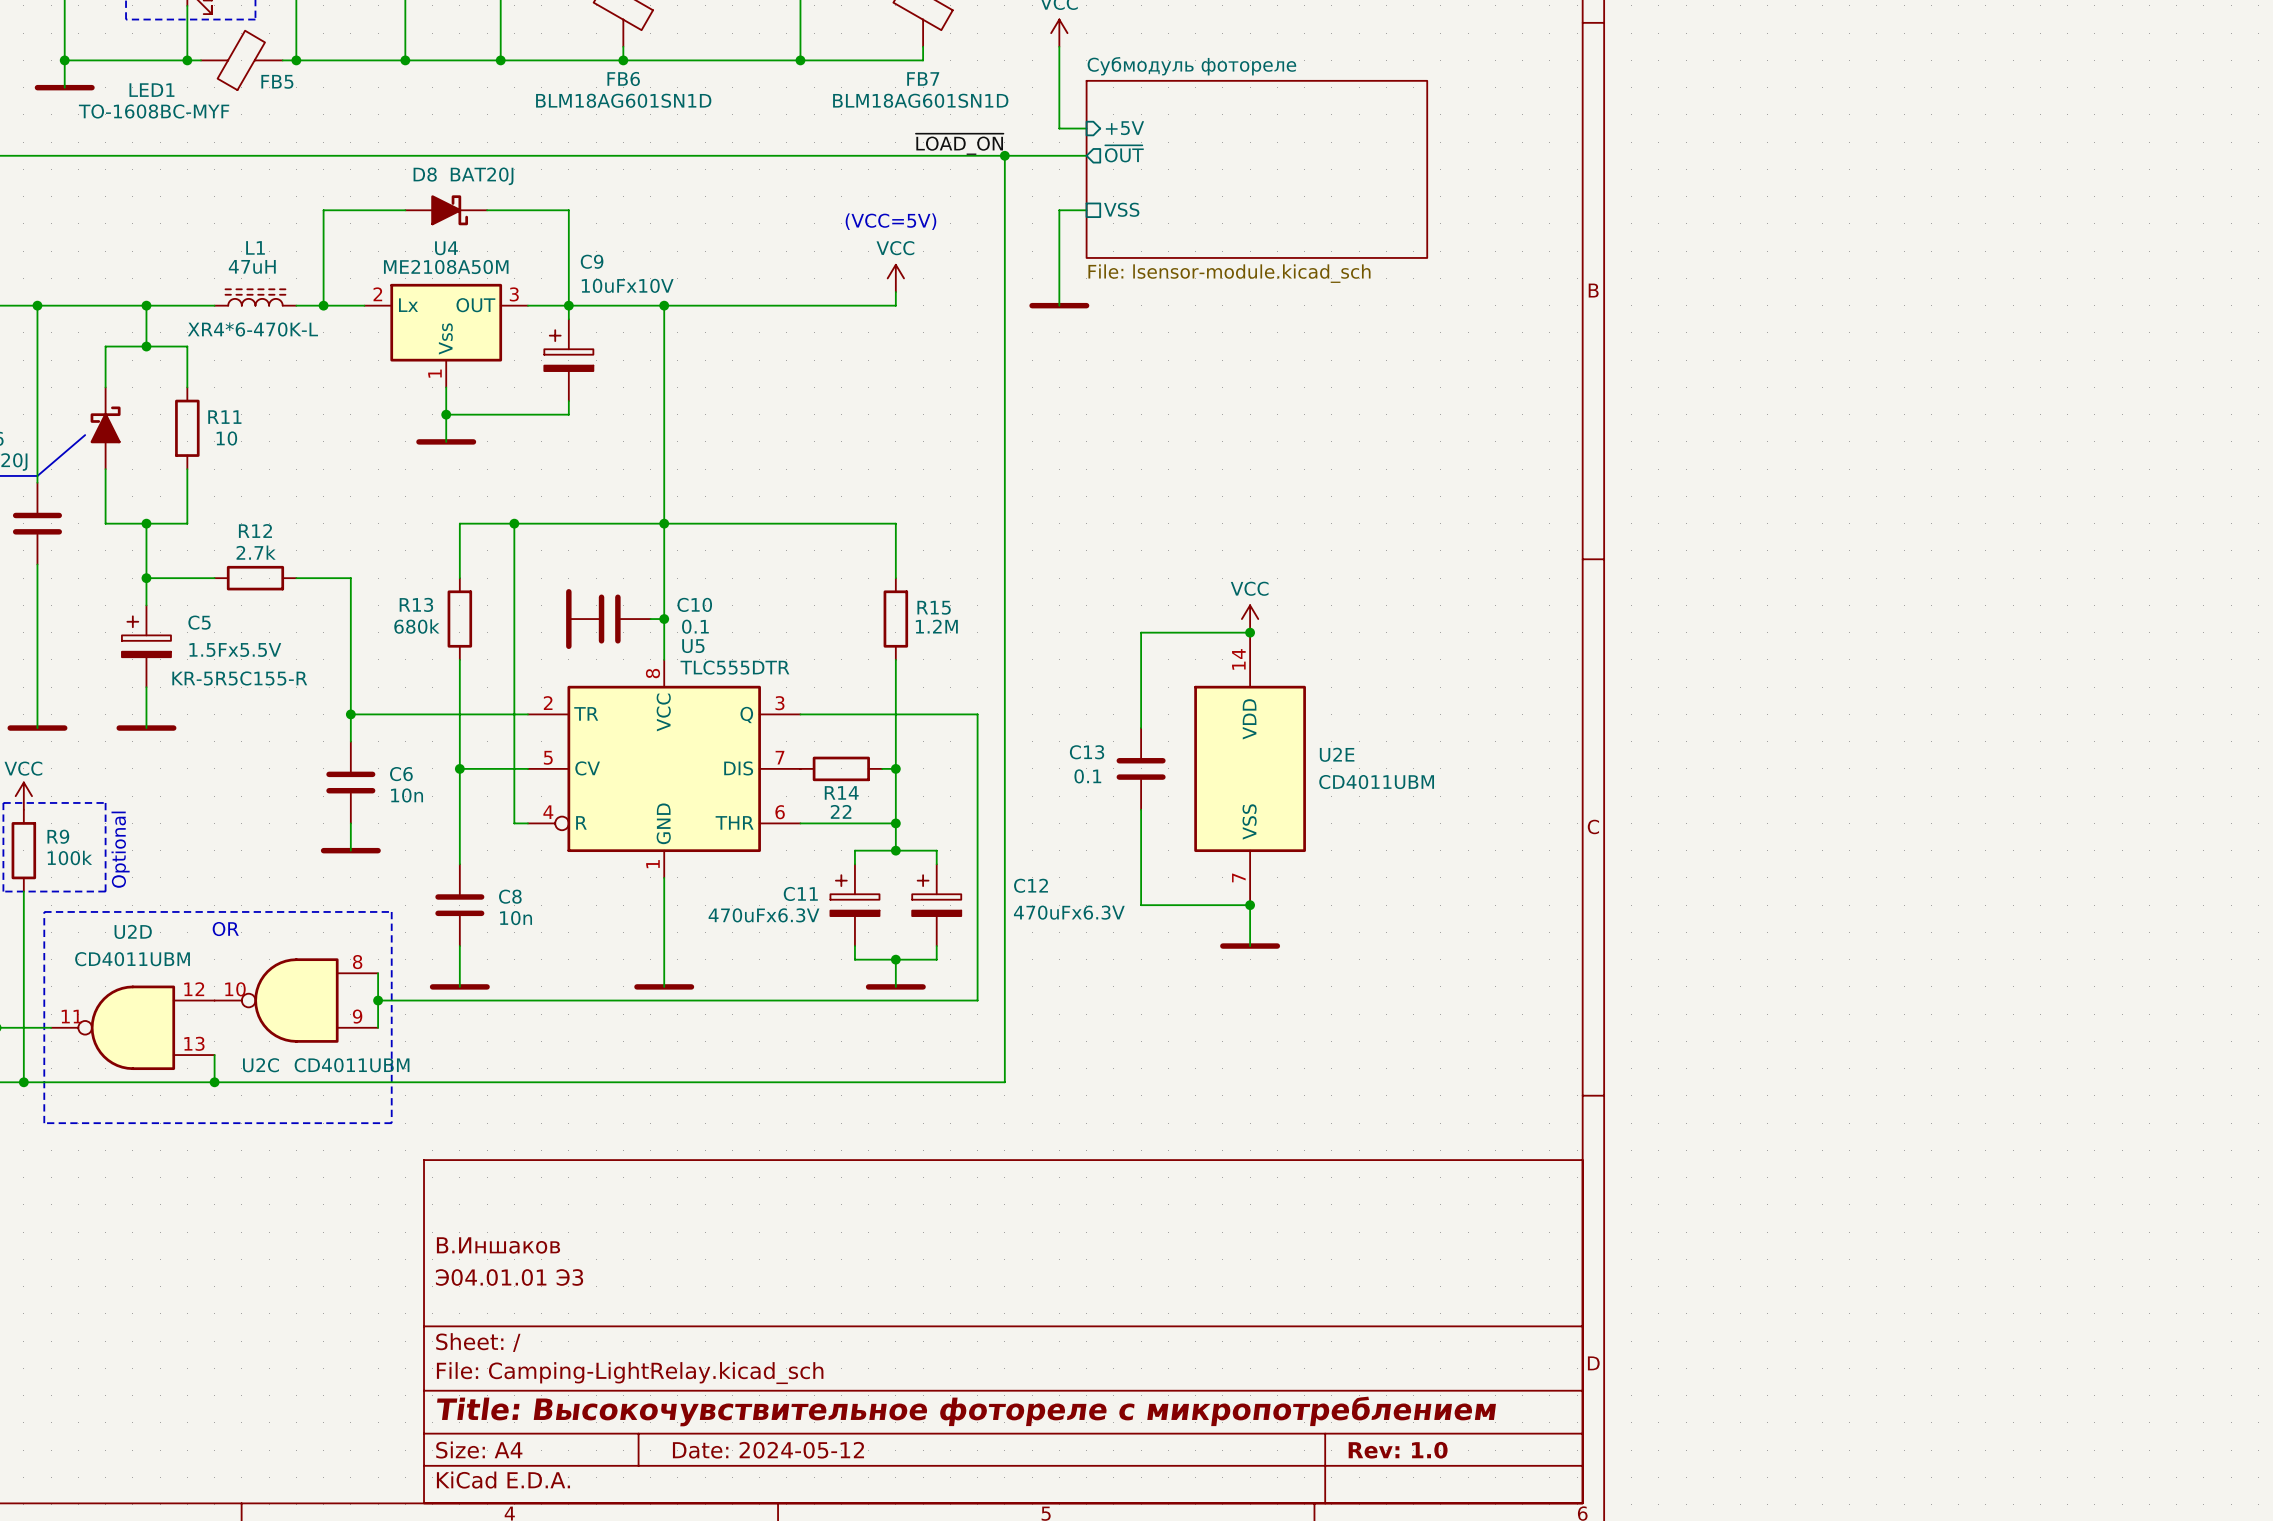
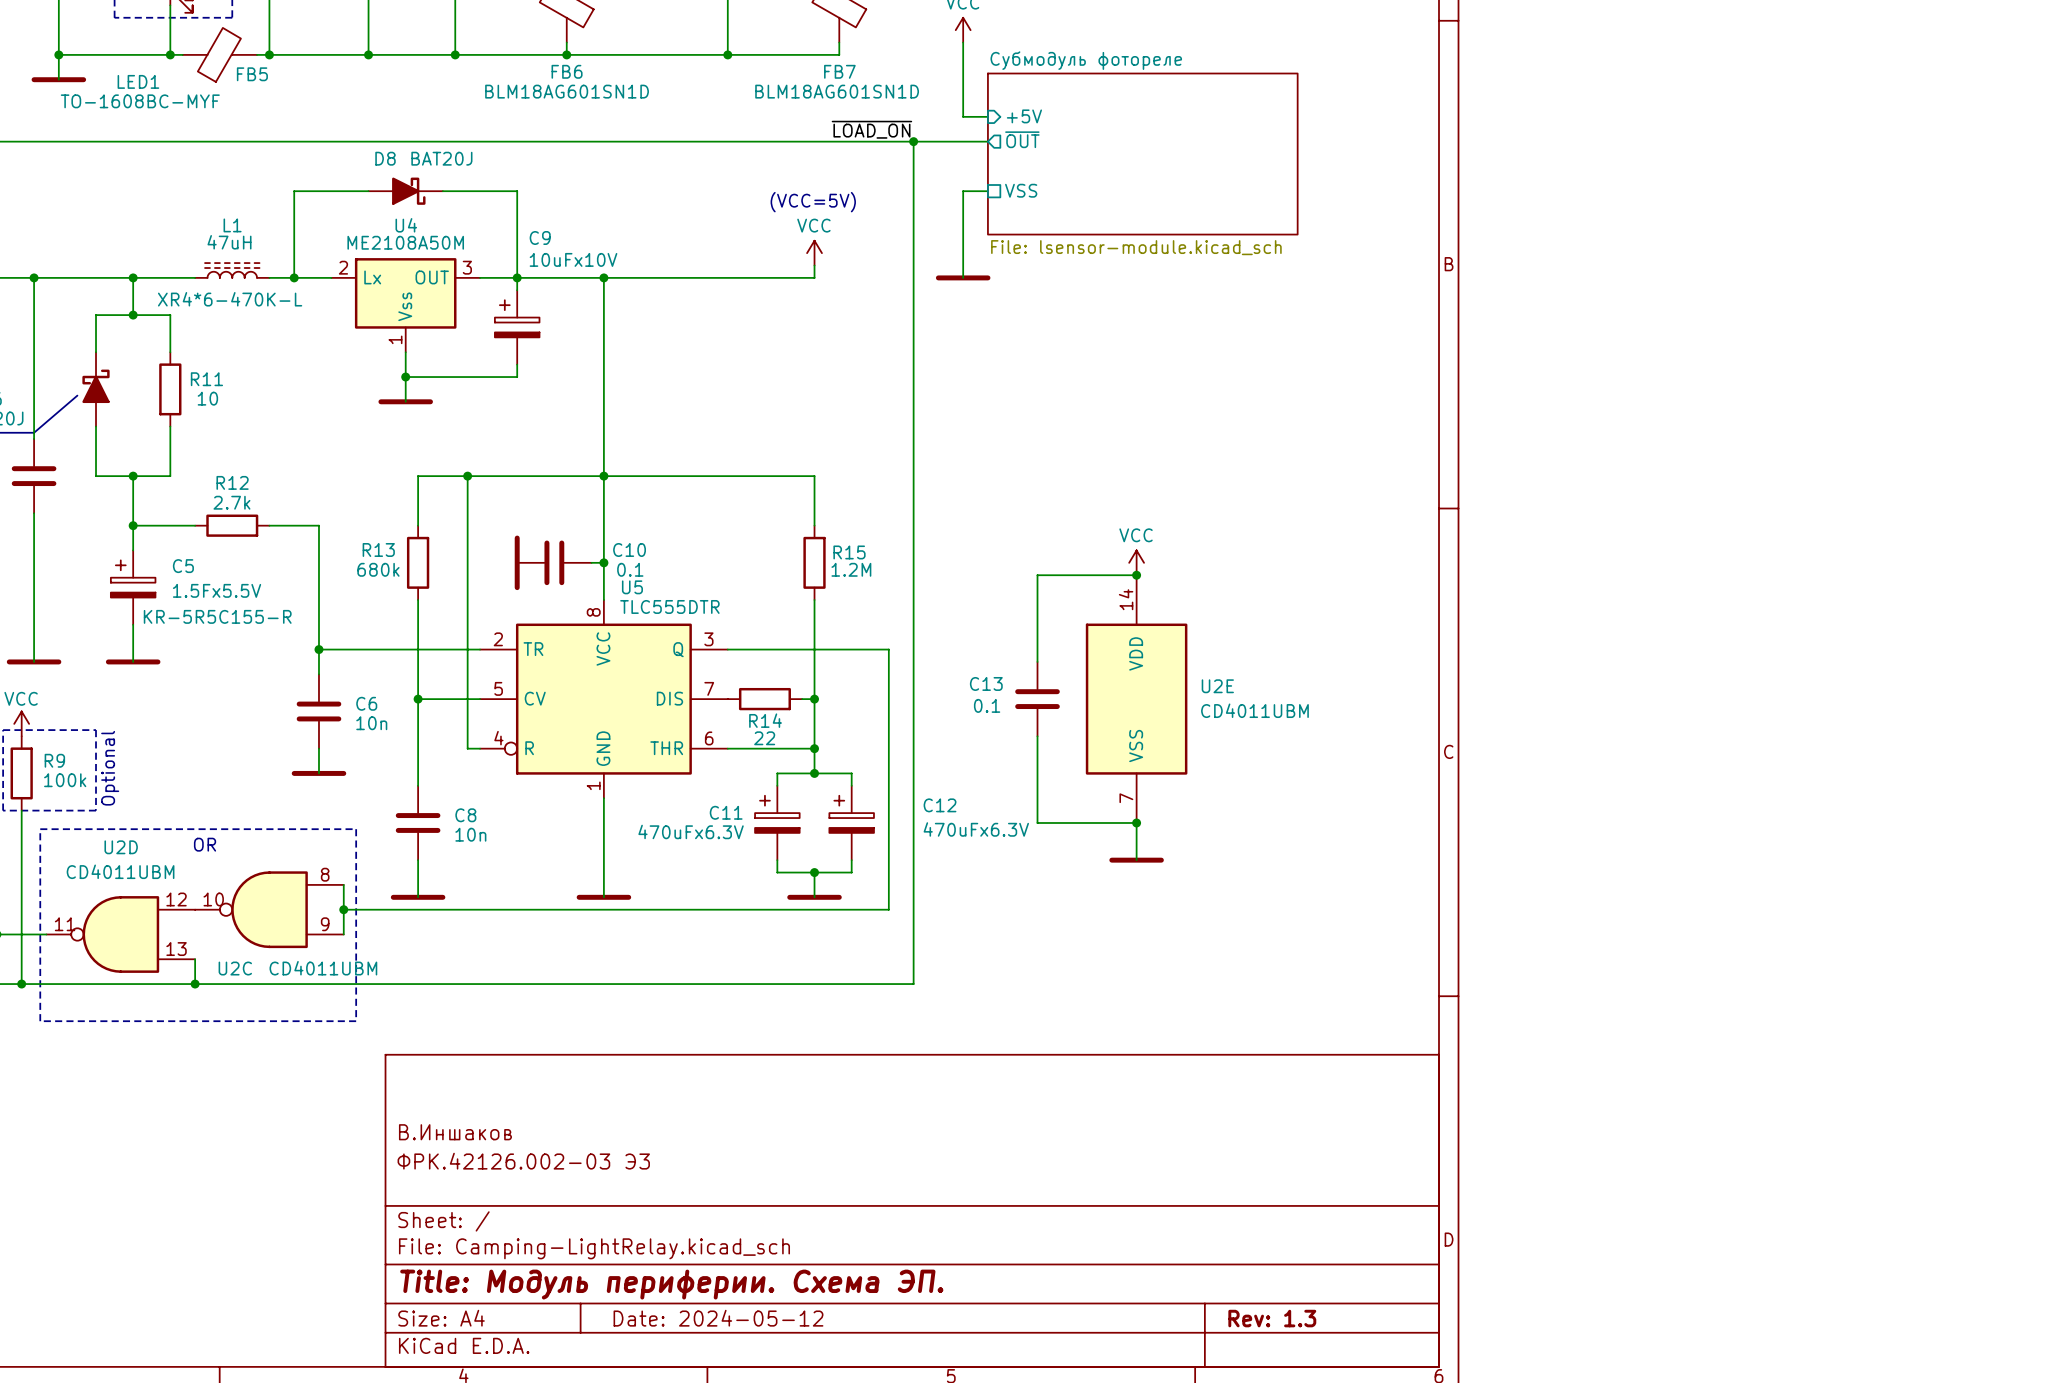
title block: Э04.01.01 Э3 (509, 1277) -> ФРК.42126.002-03 Э3 (523, 1161)
title block: Title: Высокочувствительное фотореле с микропотреблением (966, 1411) -> Title: Модуль периферии. Схема ЭП. (671, 1284)
title block: Rev: 1.0 (1398, 1450) -> Rev: 1.3 (1272, 1318)

